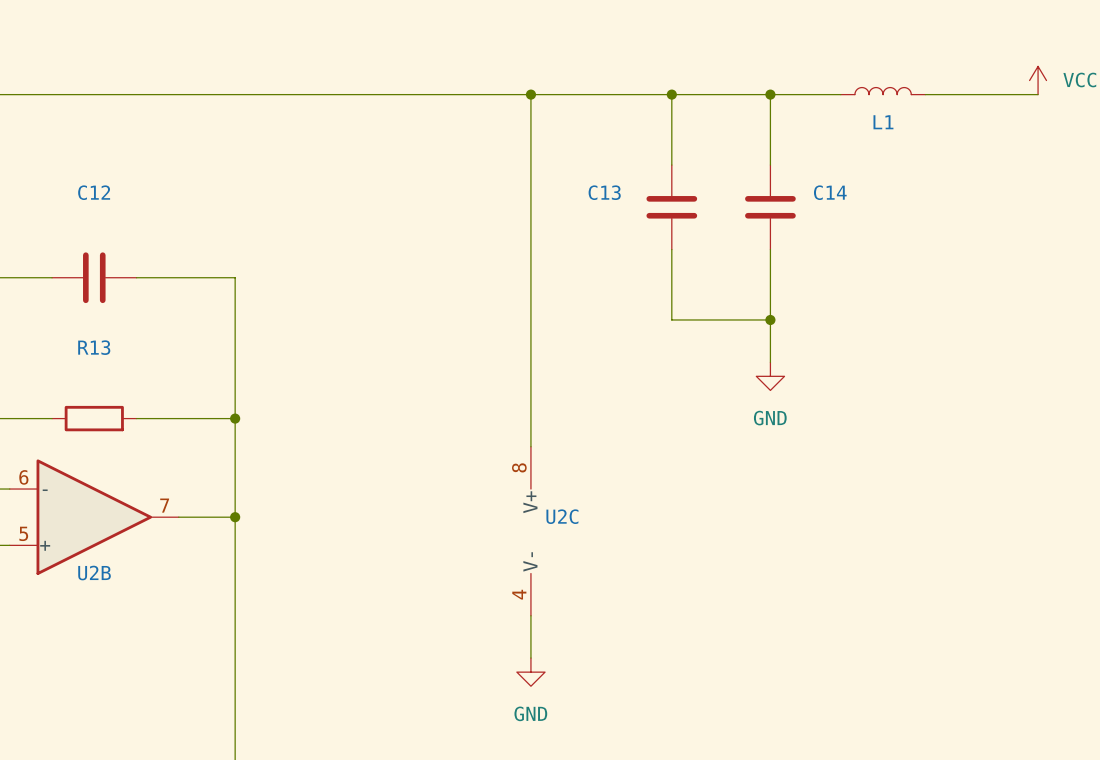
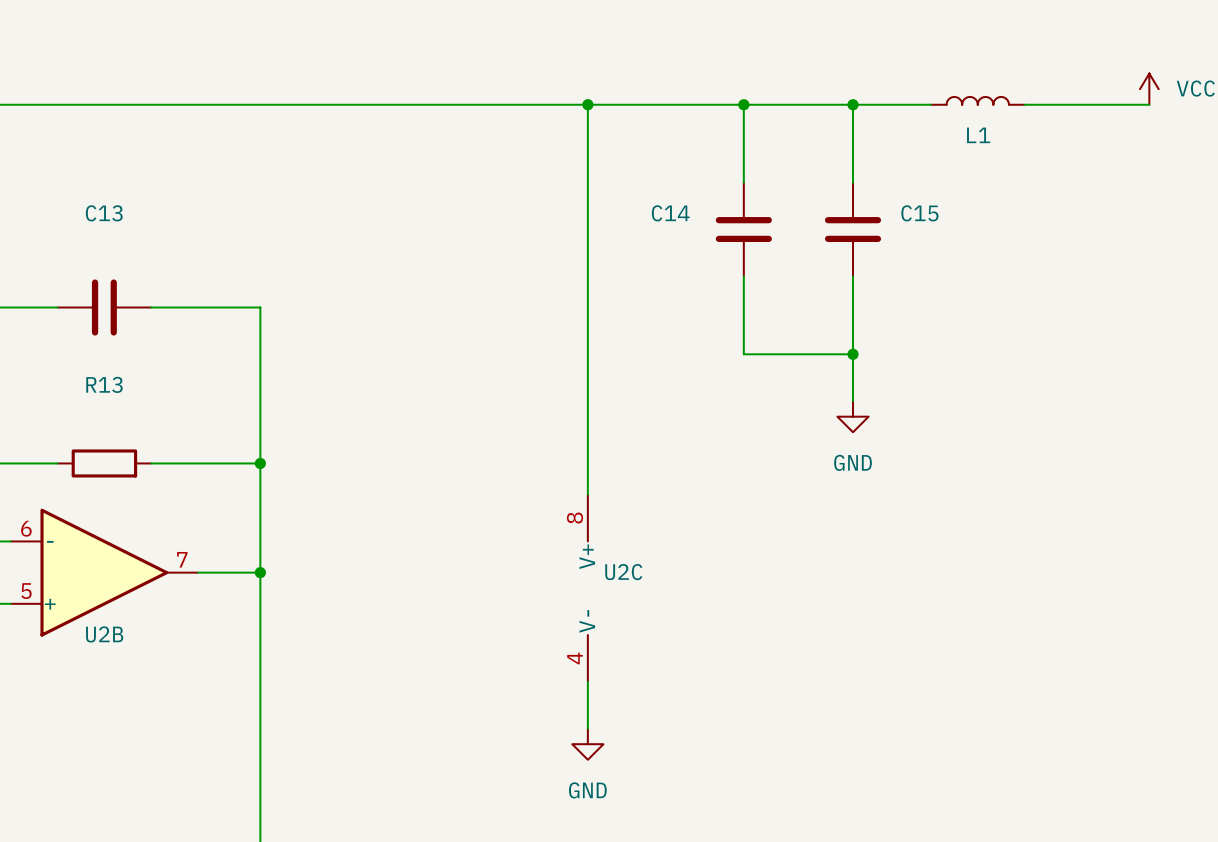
C12 name: C12 (94, 192) -> C13 (104, 213)
C13 name: C13 (604, 192) -> C14 (670, 213)
C14 name: C14 (830, 192) -> C15 (919, 213)

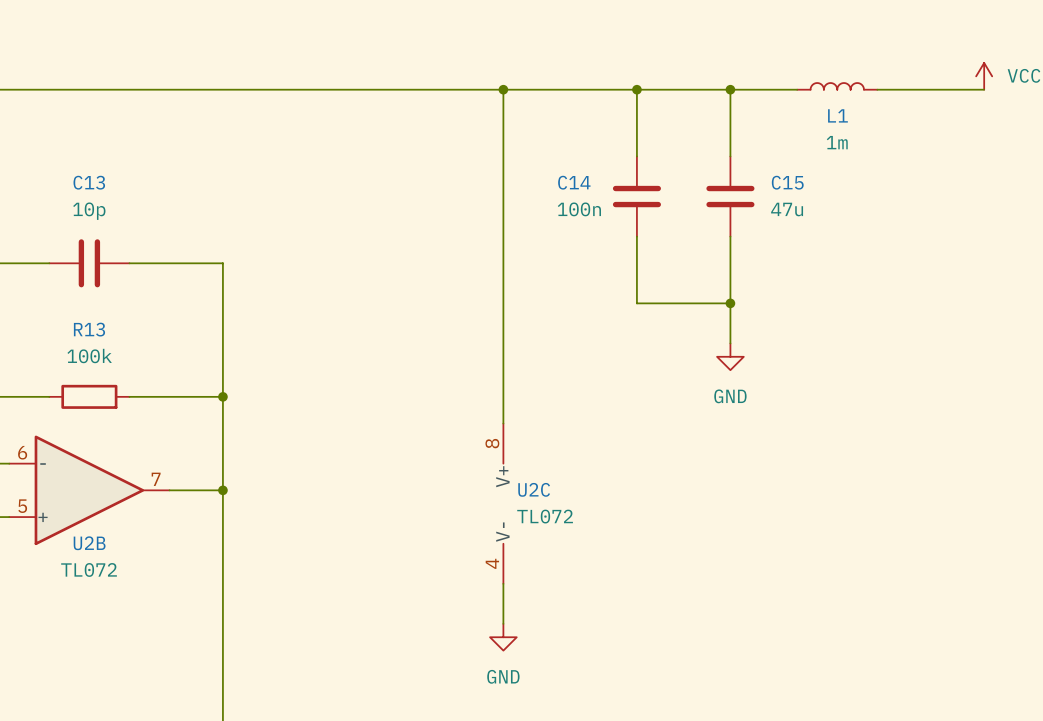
L1 value: none -> 1m (837, 142)
C14 value: none -> 100n (579, 209)
C15 value: none -> 47u (787, 209)
C13 value: none -> 10p (89, 211)
R13 value: none -> 100k (89, 356)
U2C value: none -> TL072 (545, 516)
U2B value: none -> TL072 (89, 569)

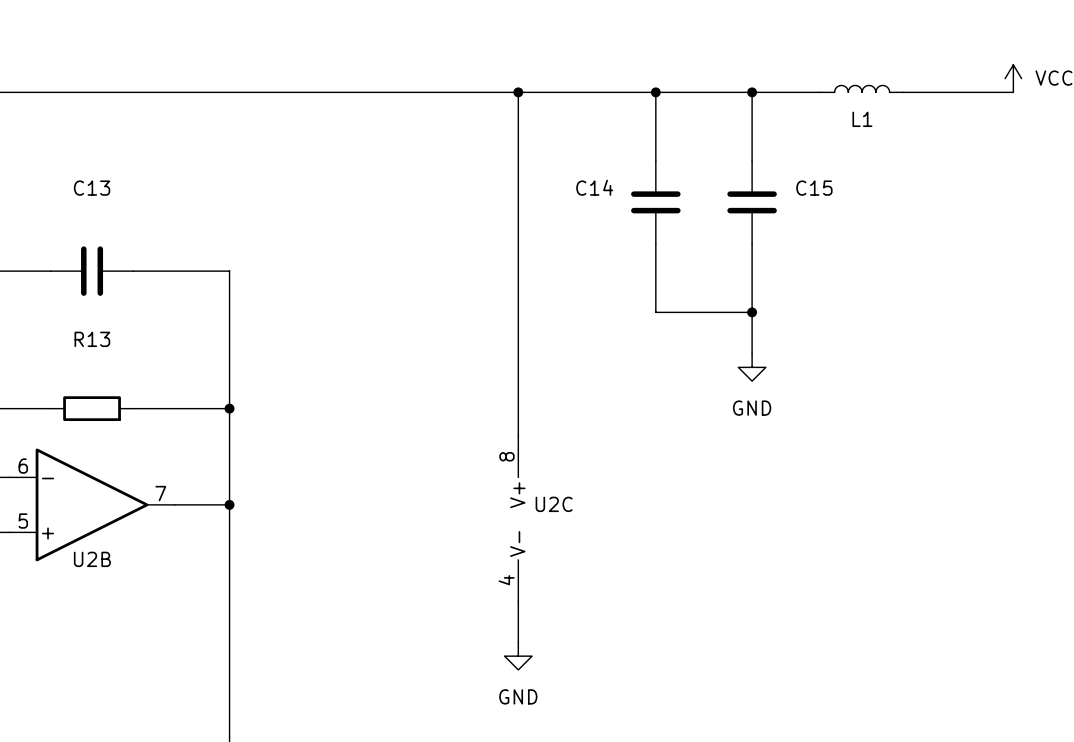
L1 value: 1m (837, 142) -> none
C14 value: 100n (579, 209) -> none
C15 value: 47u (787, 209) -> none
C13 value: 10p (89, 211) -> none
R13 value: 100k (89, 356) -> none
U2C value: TL072 (545, 516) -> none
U2B value: TL072 (89, 569) -> none

